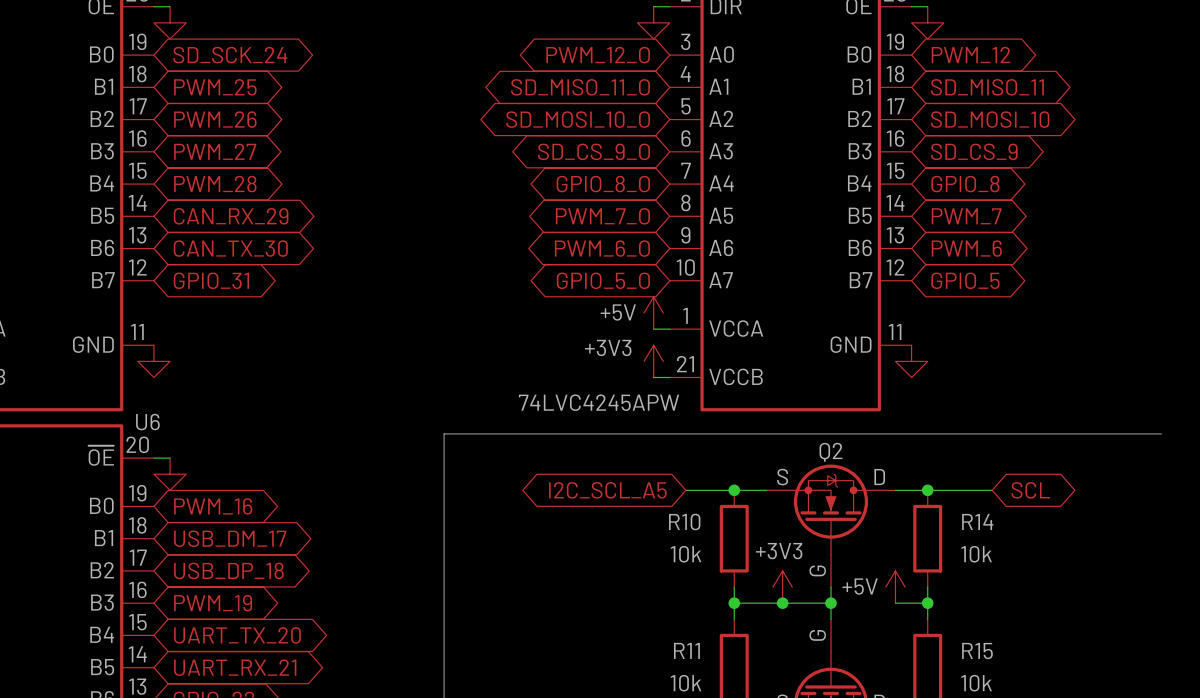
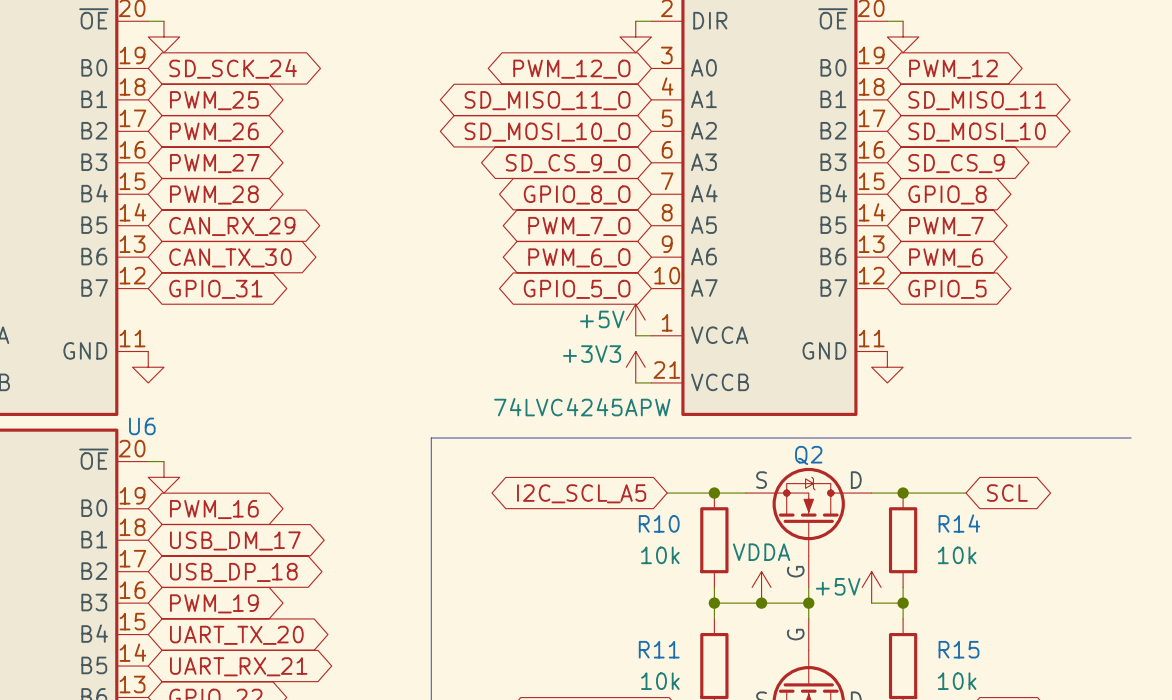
power symbol: +3V3 (782, 587) -> VDDA (761, 587)

